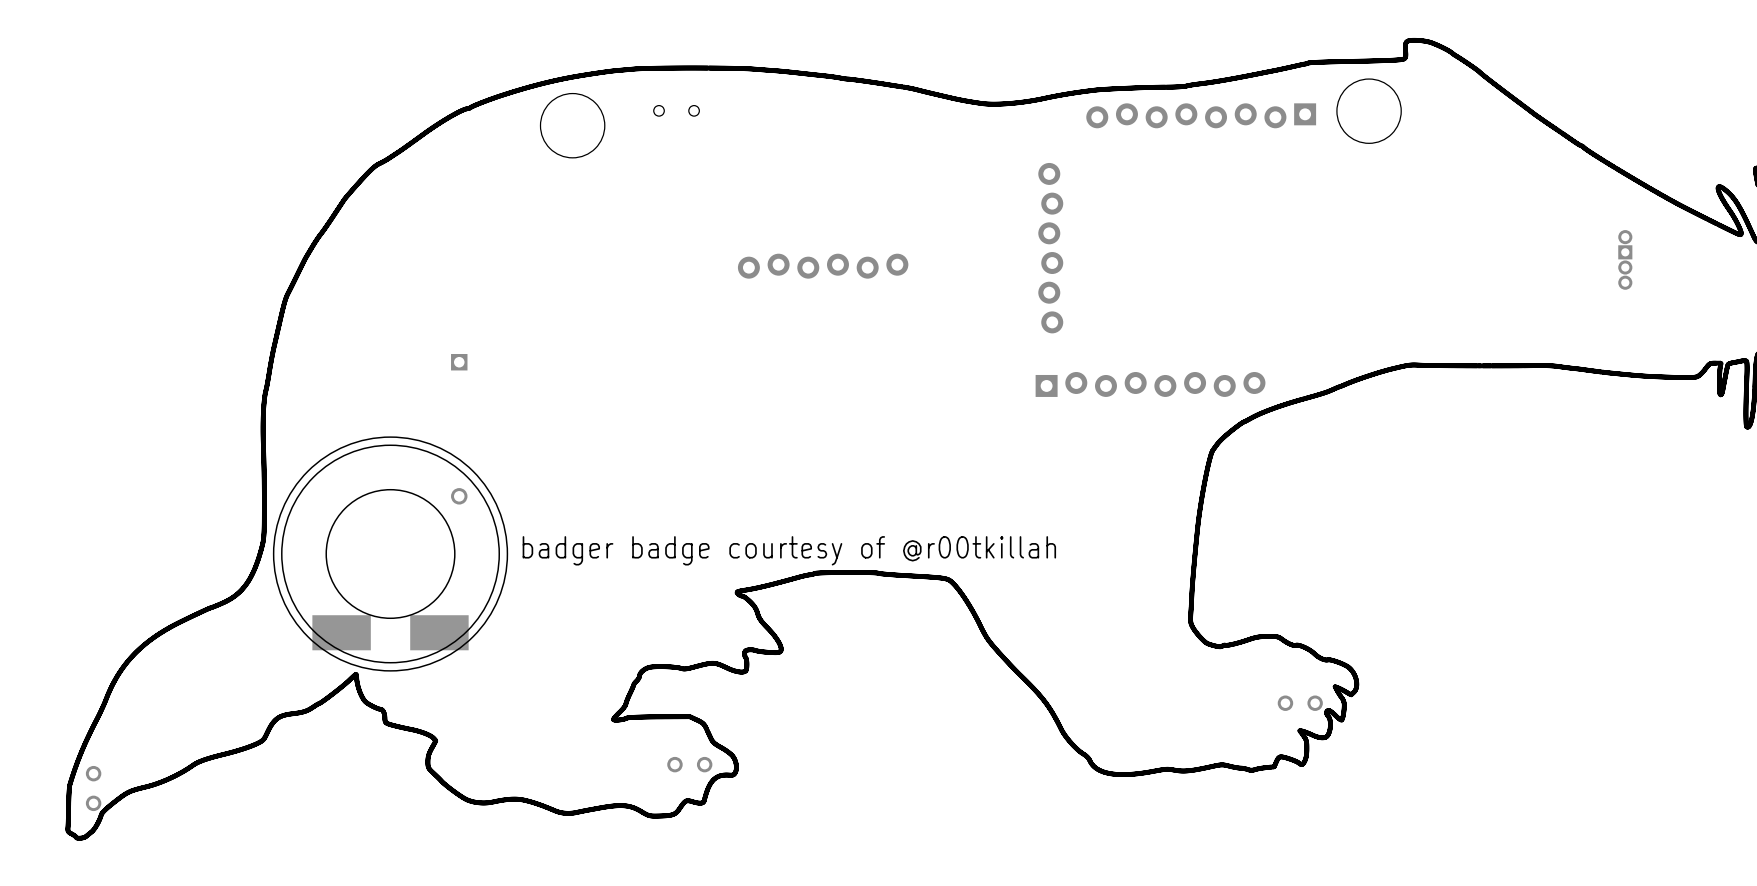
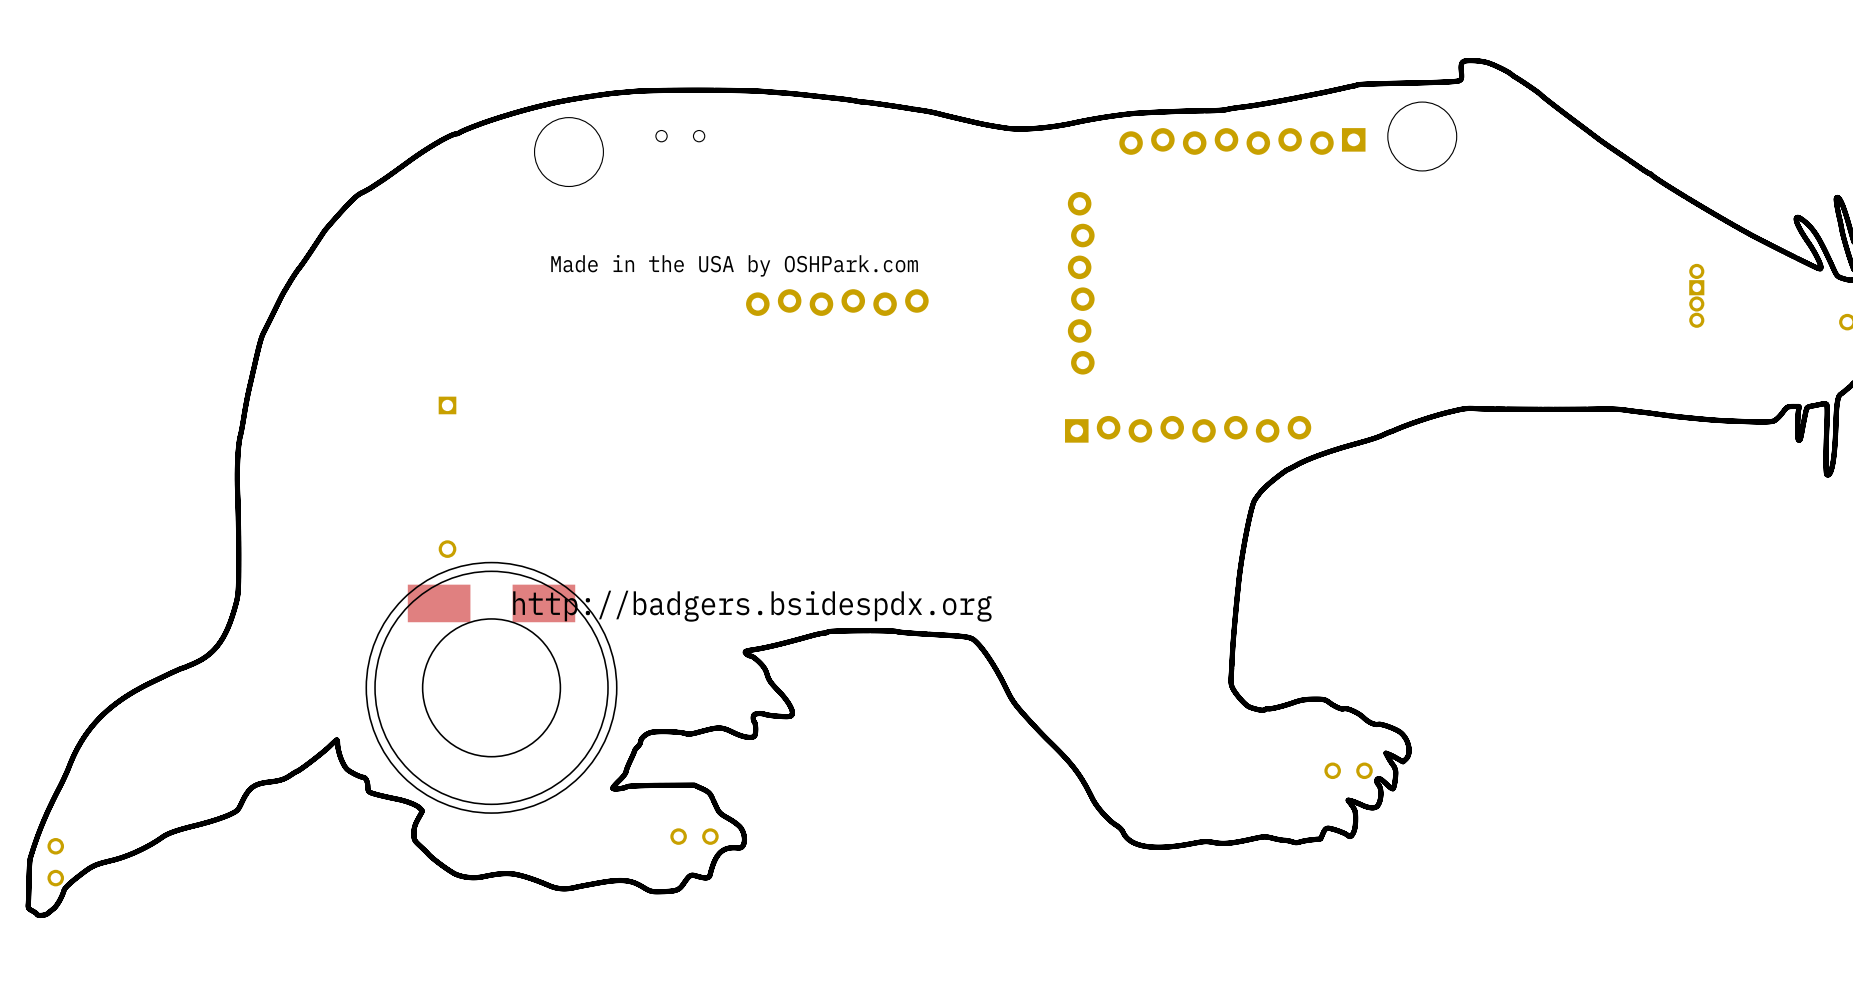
text: none -> Made in the USA by OSHPark.com (734, 265)
text: badger badge courtesy of @r00tkillah (789, 550) -> http://badgers.bsidespdx.org (752, 606)
part rotation: 0° (390, 553) -> 180° (491, 687)

